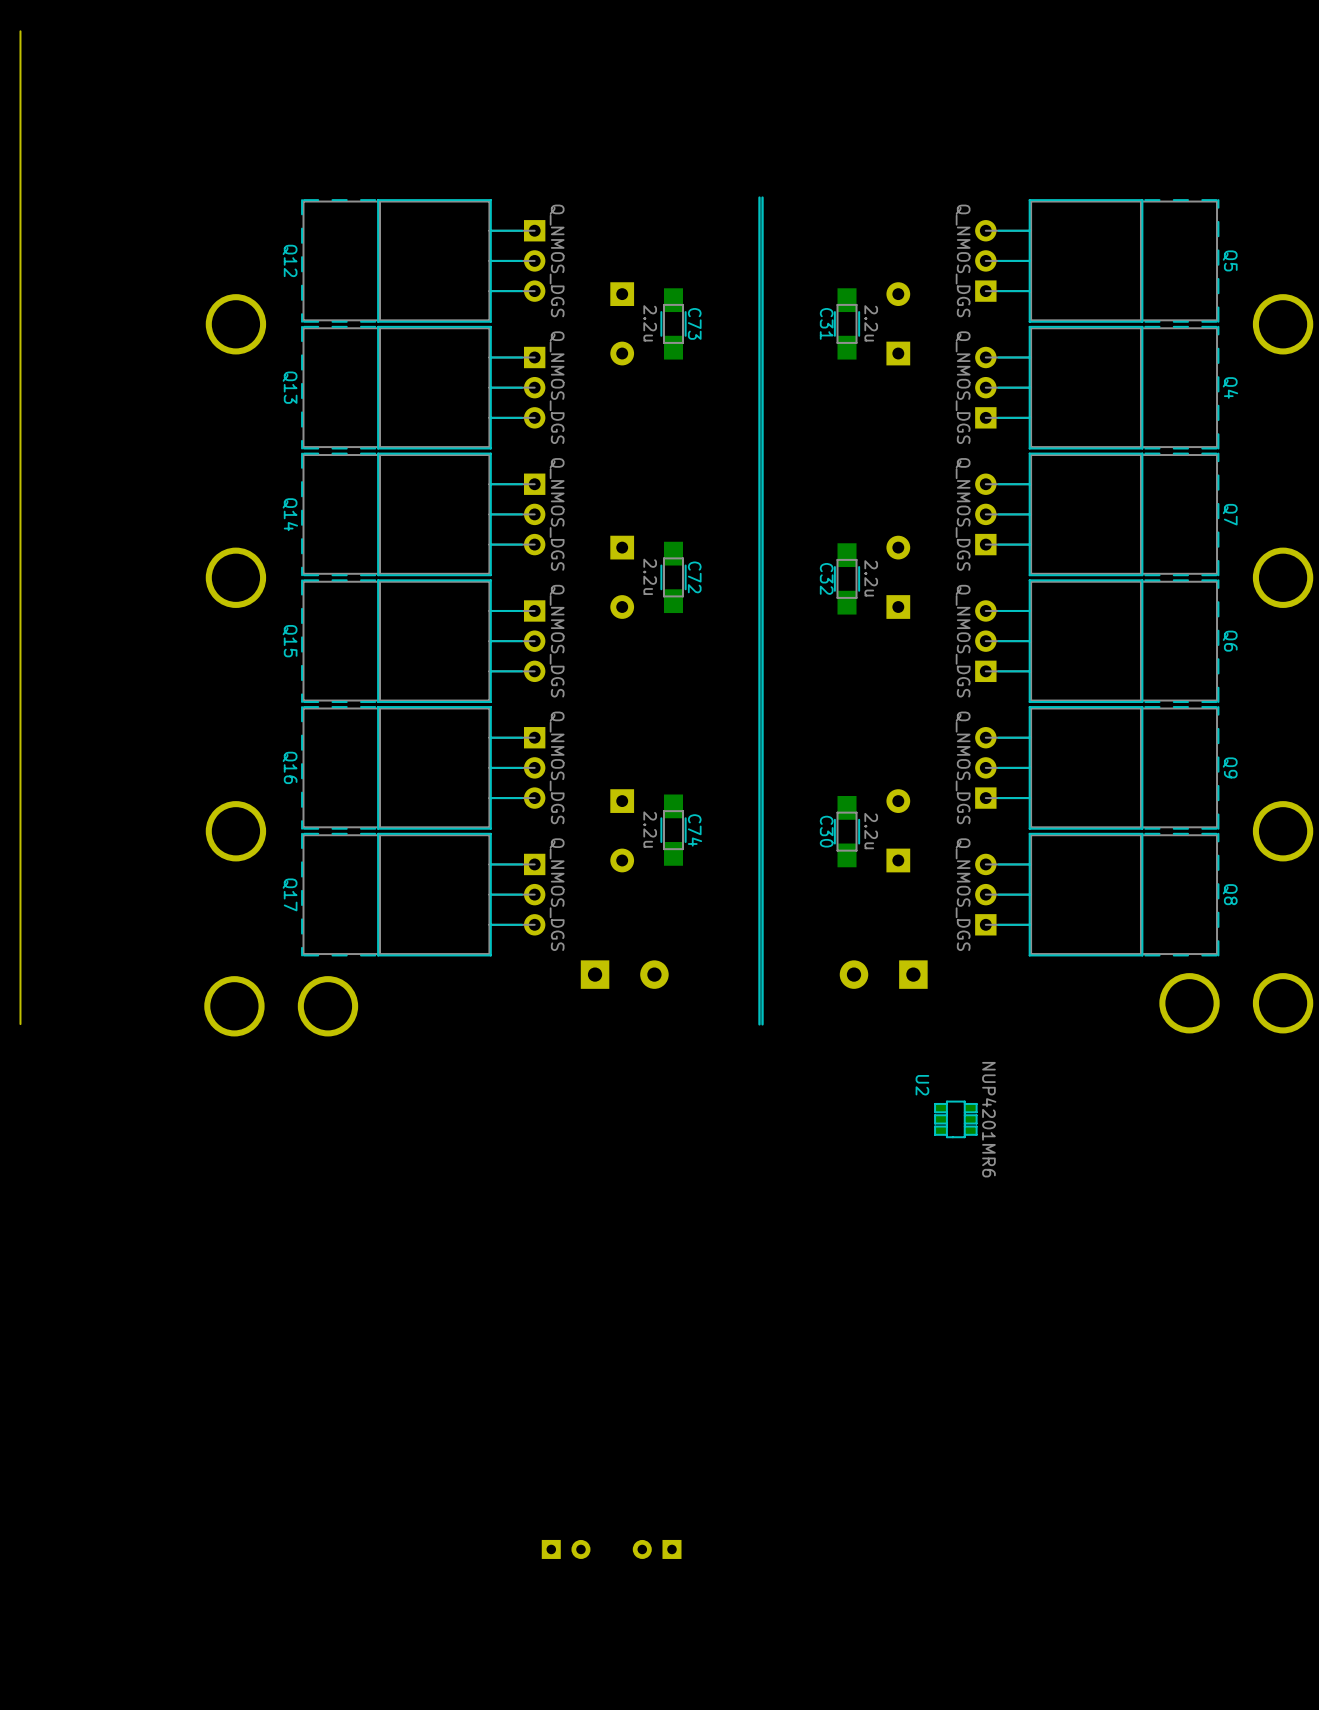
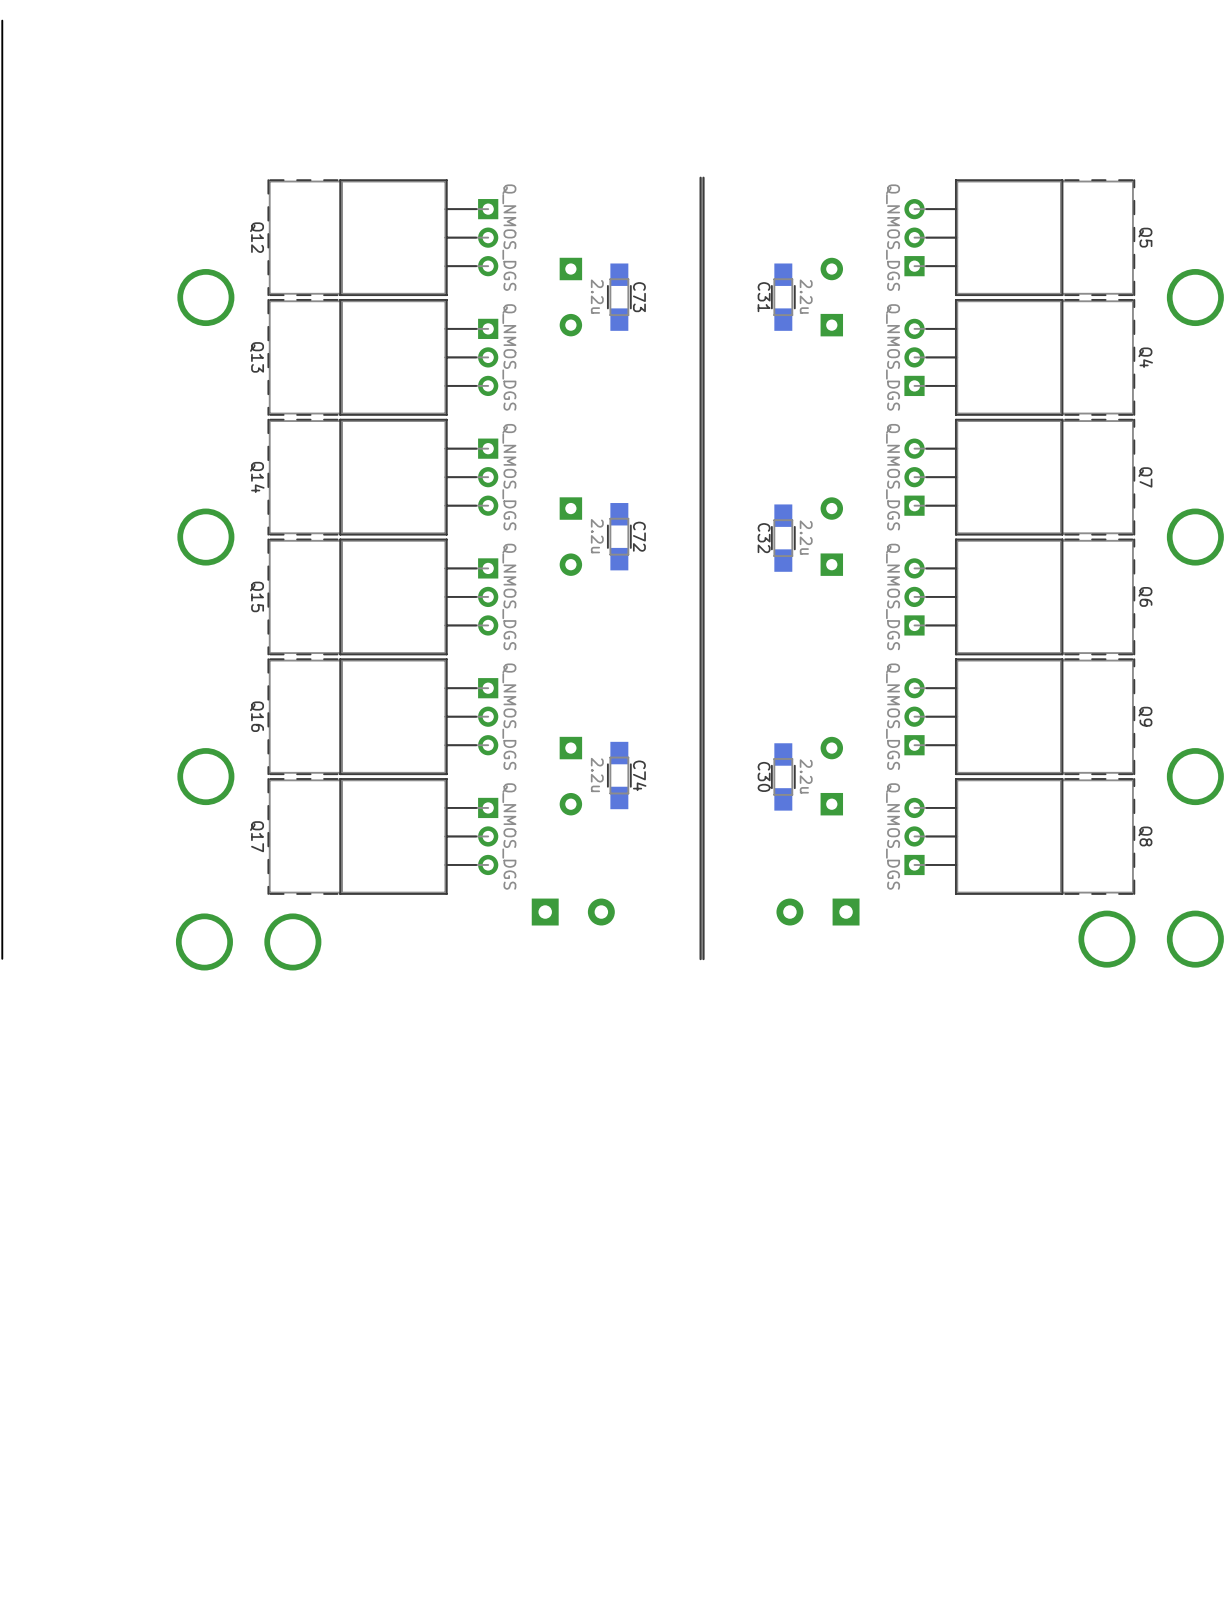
U2: NUP4201MR6 (955, 1119) -> none
part: (566, 1549) -> none
part: (657, 1549) -> none

